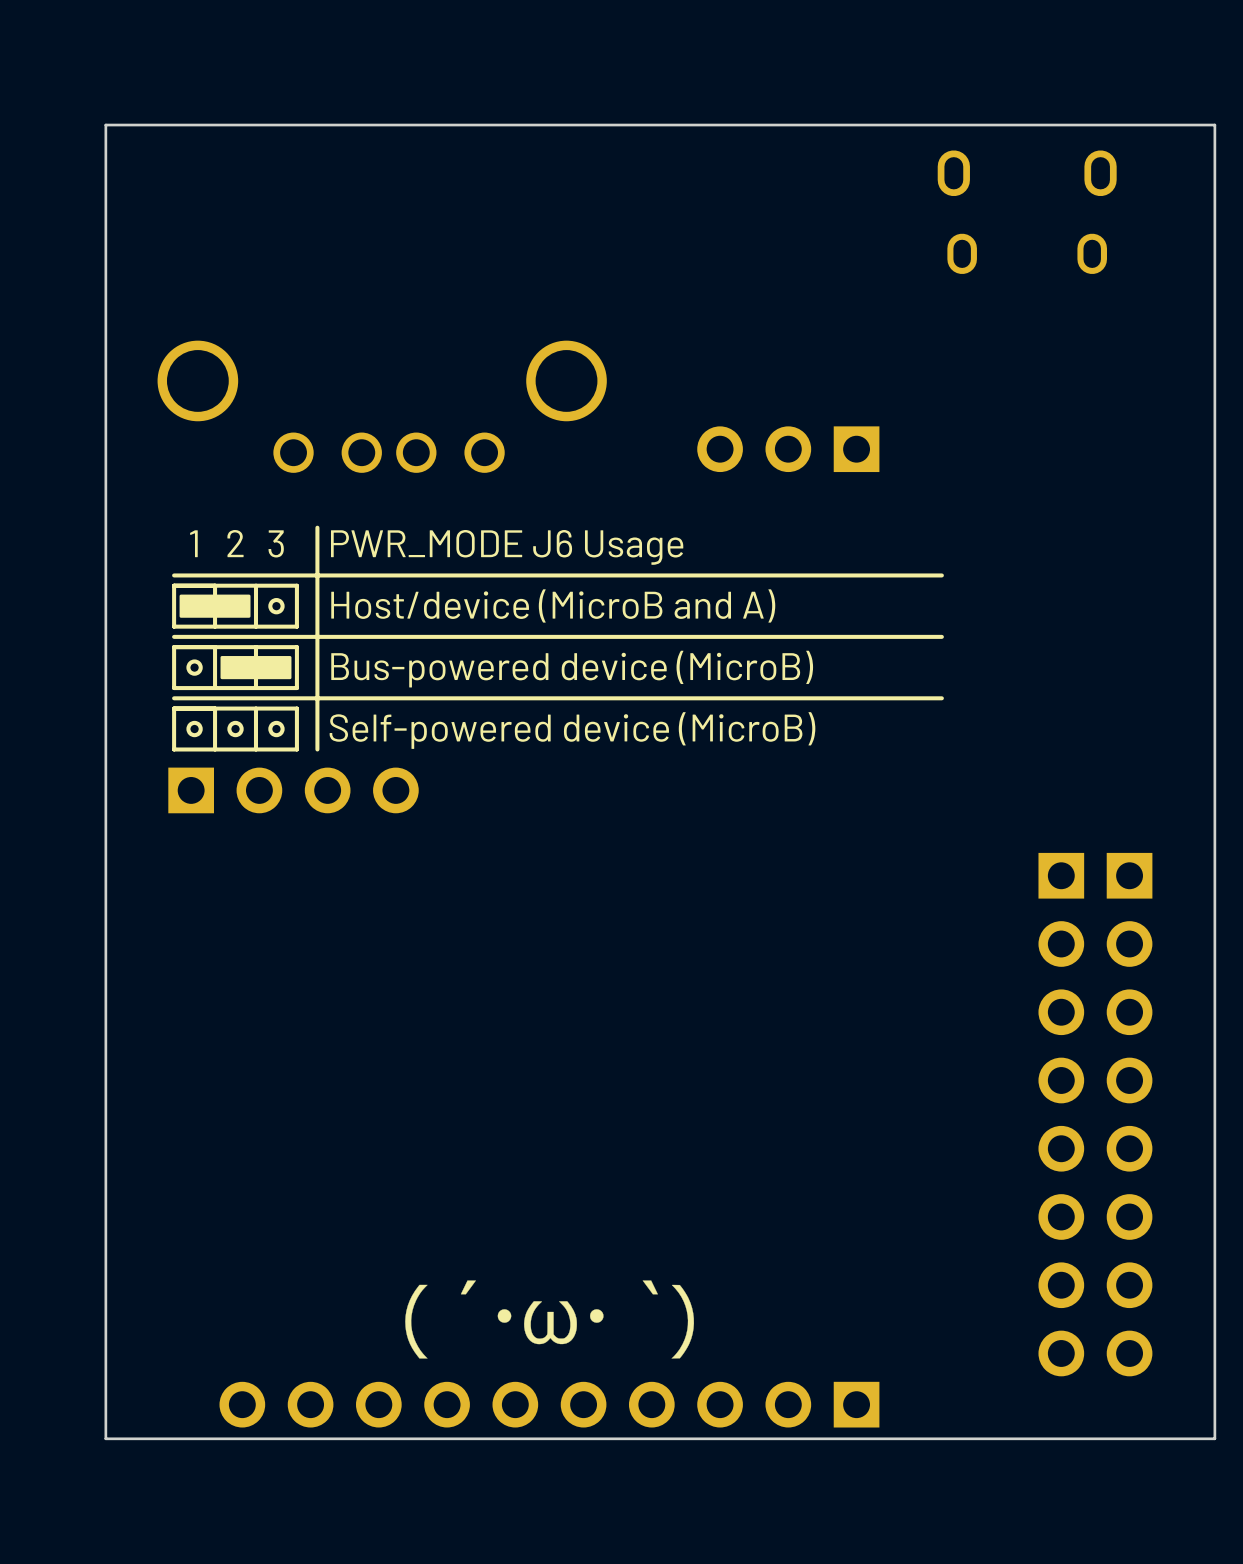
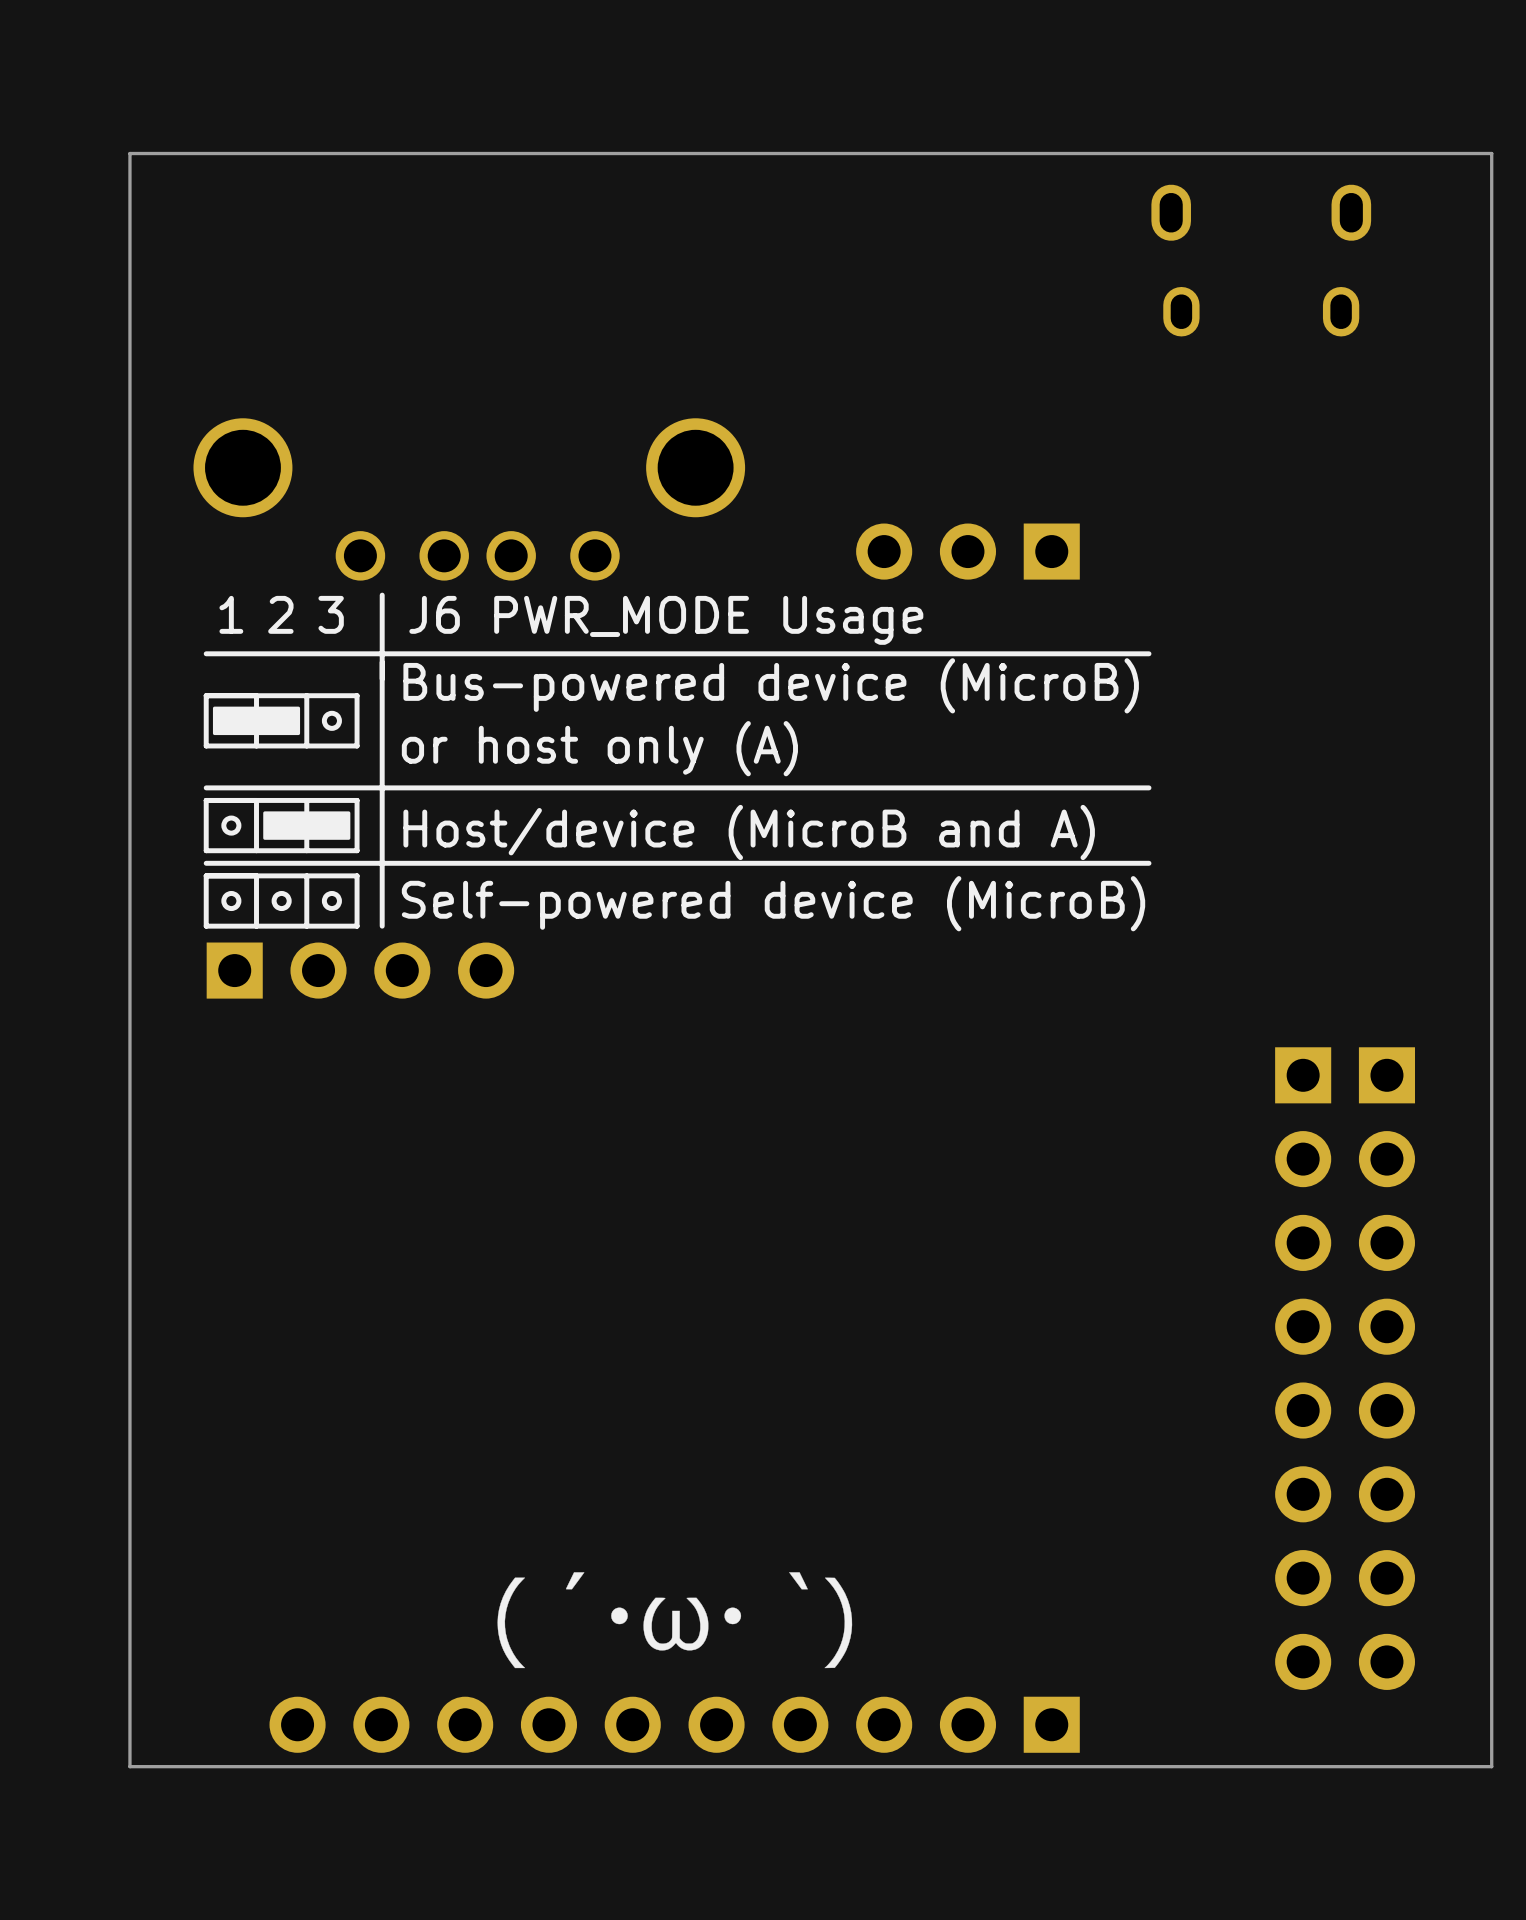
drawing shape: [172, 525, 944, 752] -> [203, 592, 1152, 932]

